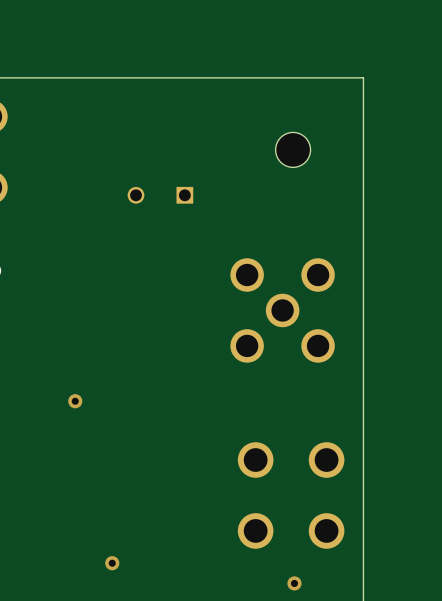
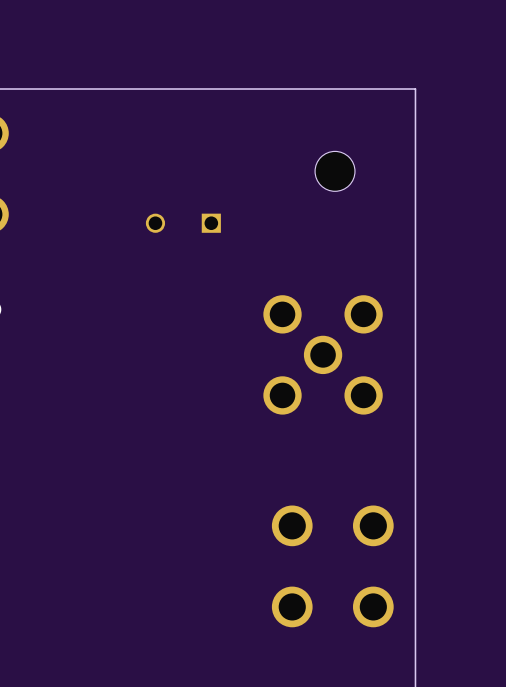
via: (75, 401) -> none
via: (112, 563) -> none
via: (294, 583) -> none

